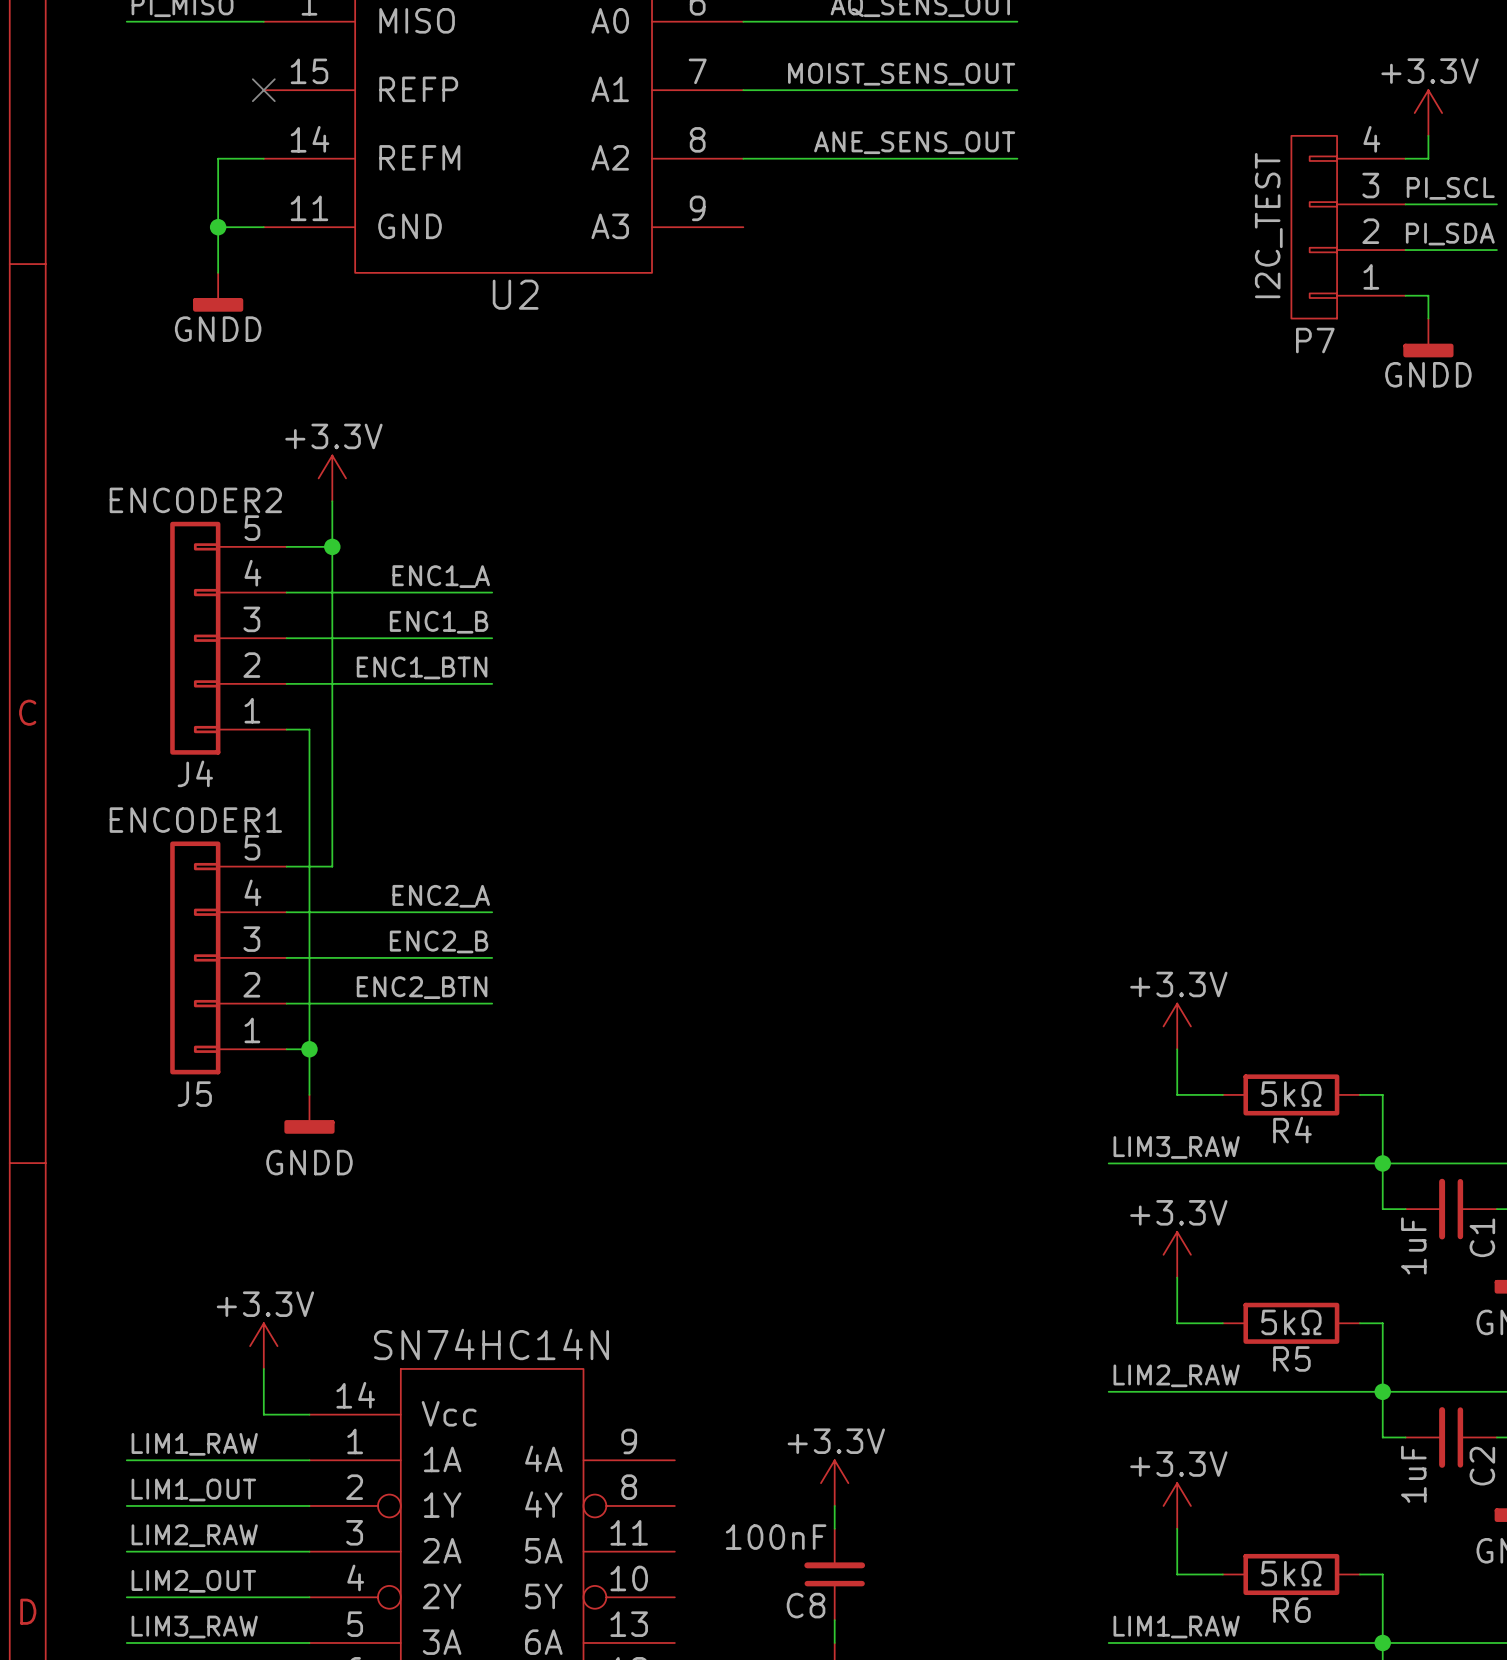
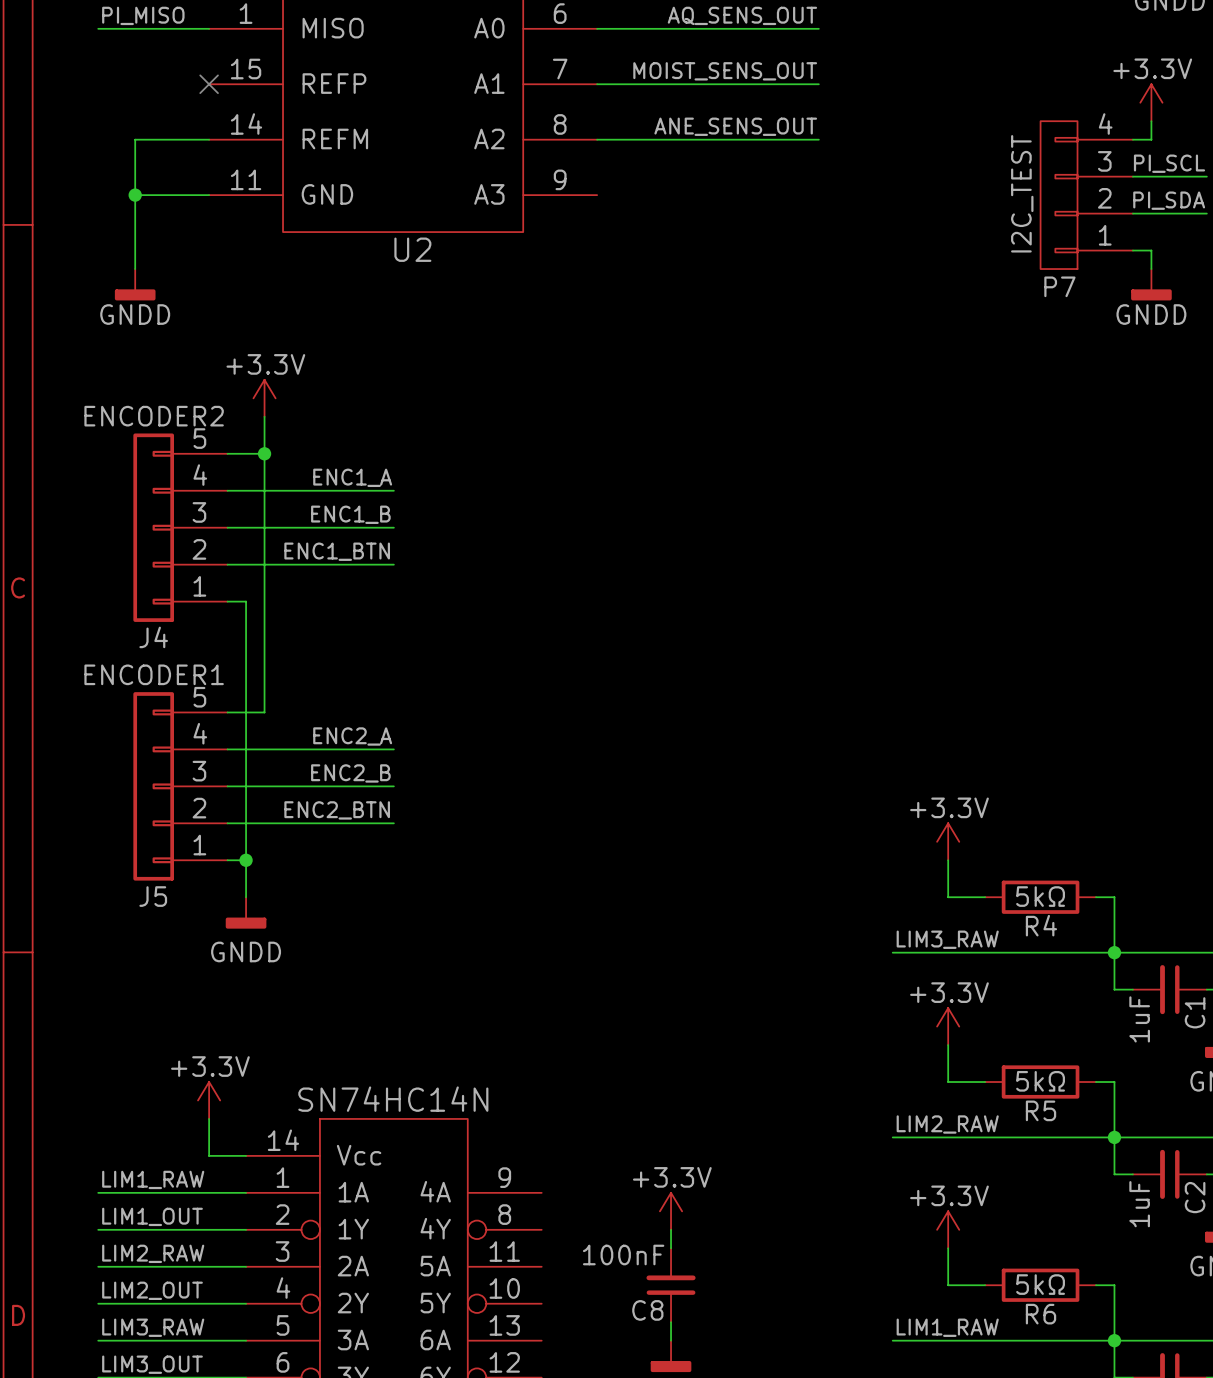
wire: (218, 158) (218, 272) -> (172, 139) (135, 139) (135, 269)
wire: none -> (135, 195) (172, 195)
junction position: (218, 227) -> (135, 195)
power symbol position: GNDD (218, 292) -> GNDD (135, 284)

